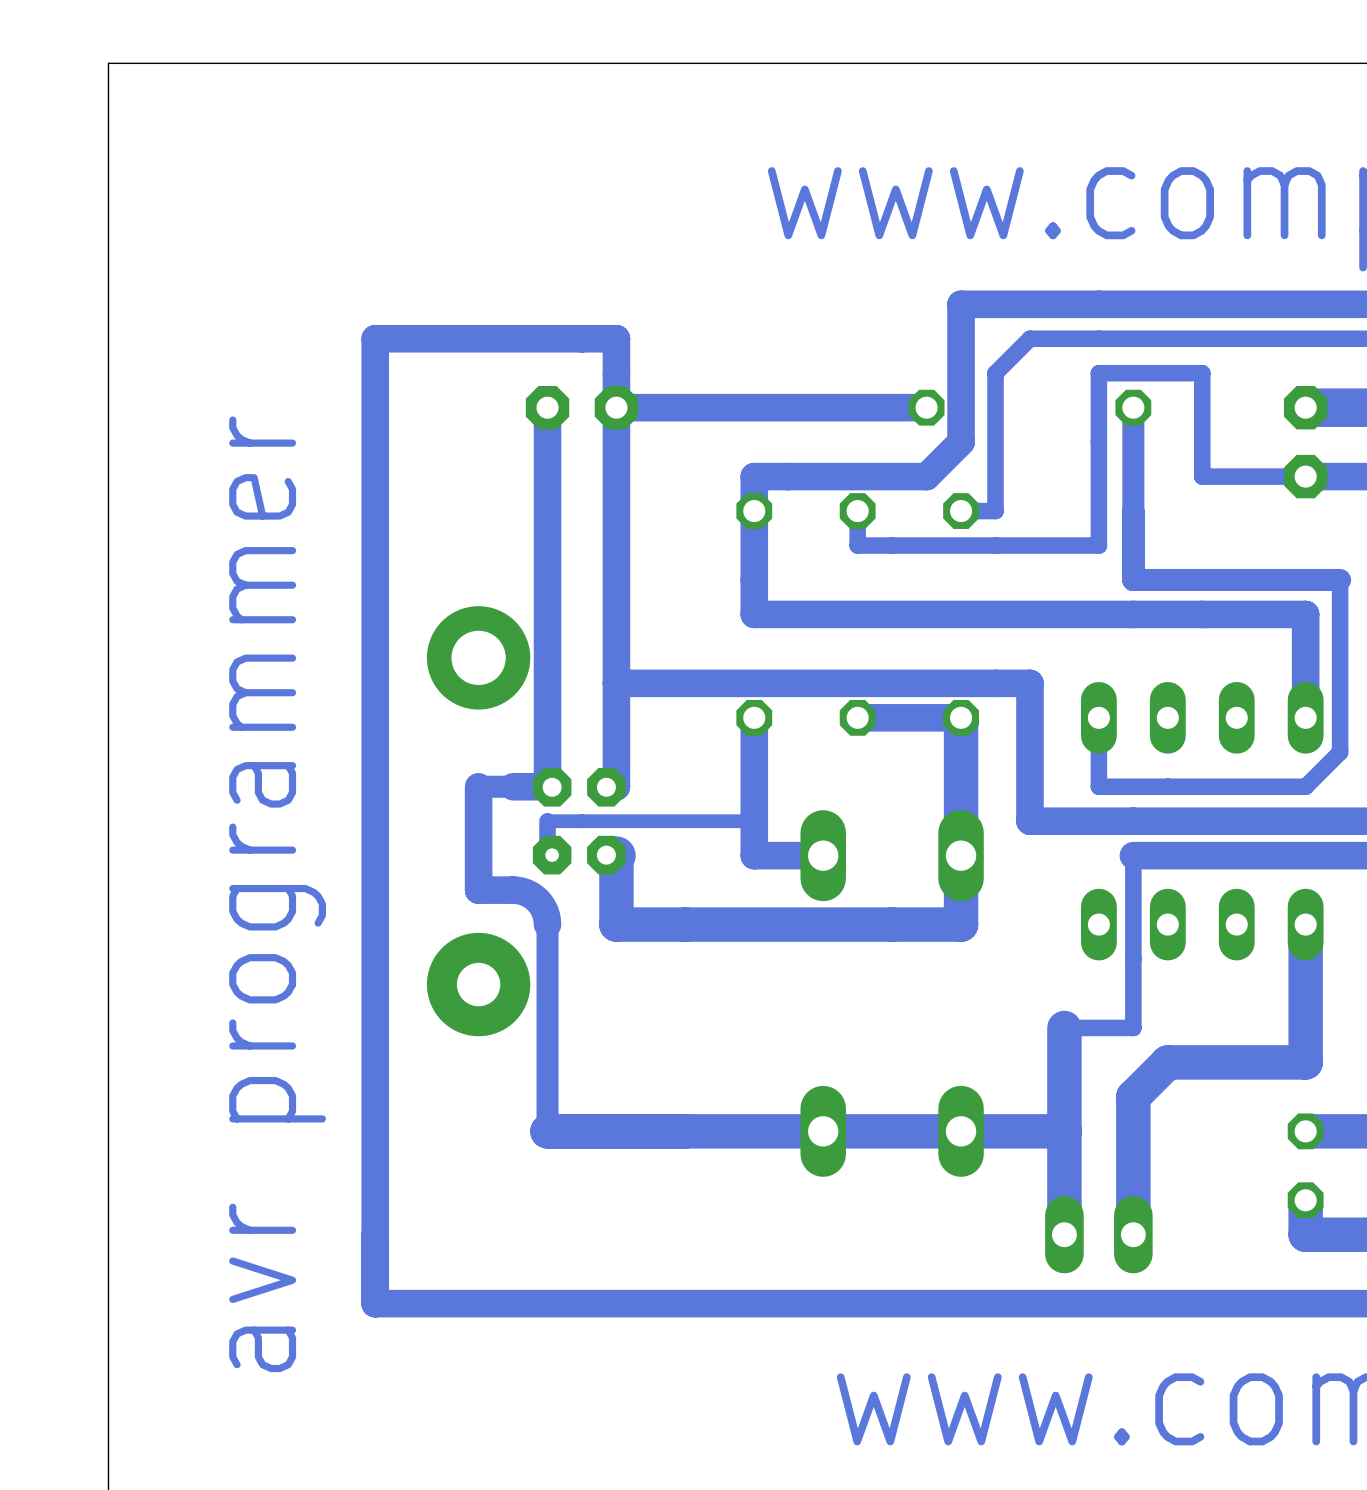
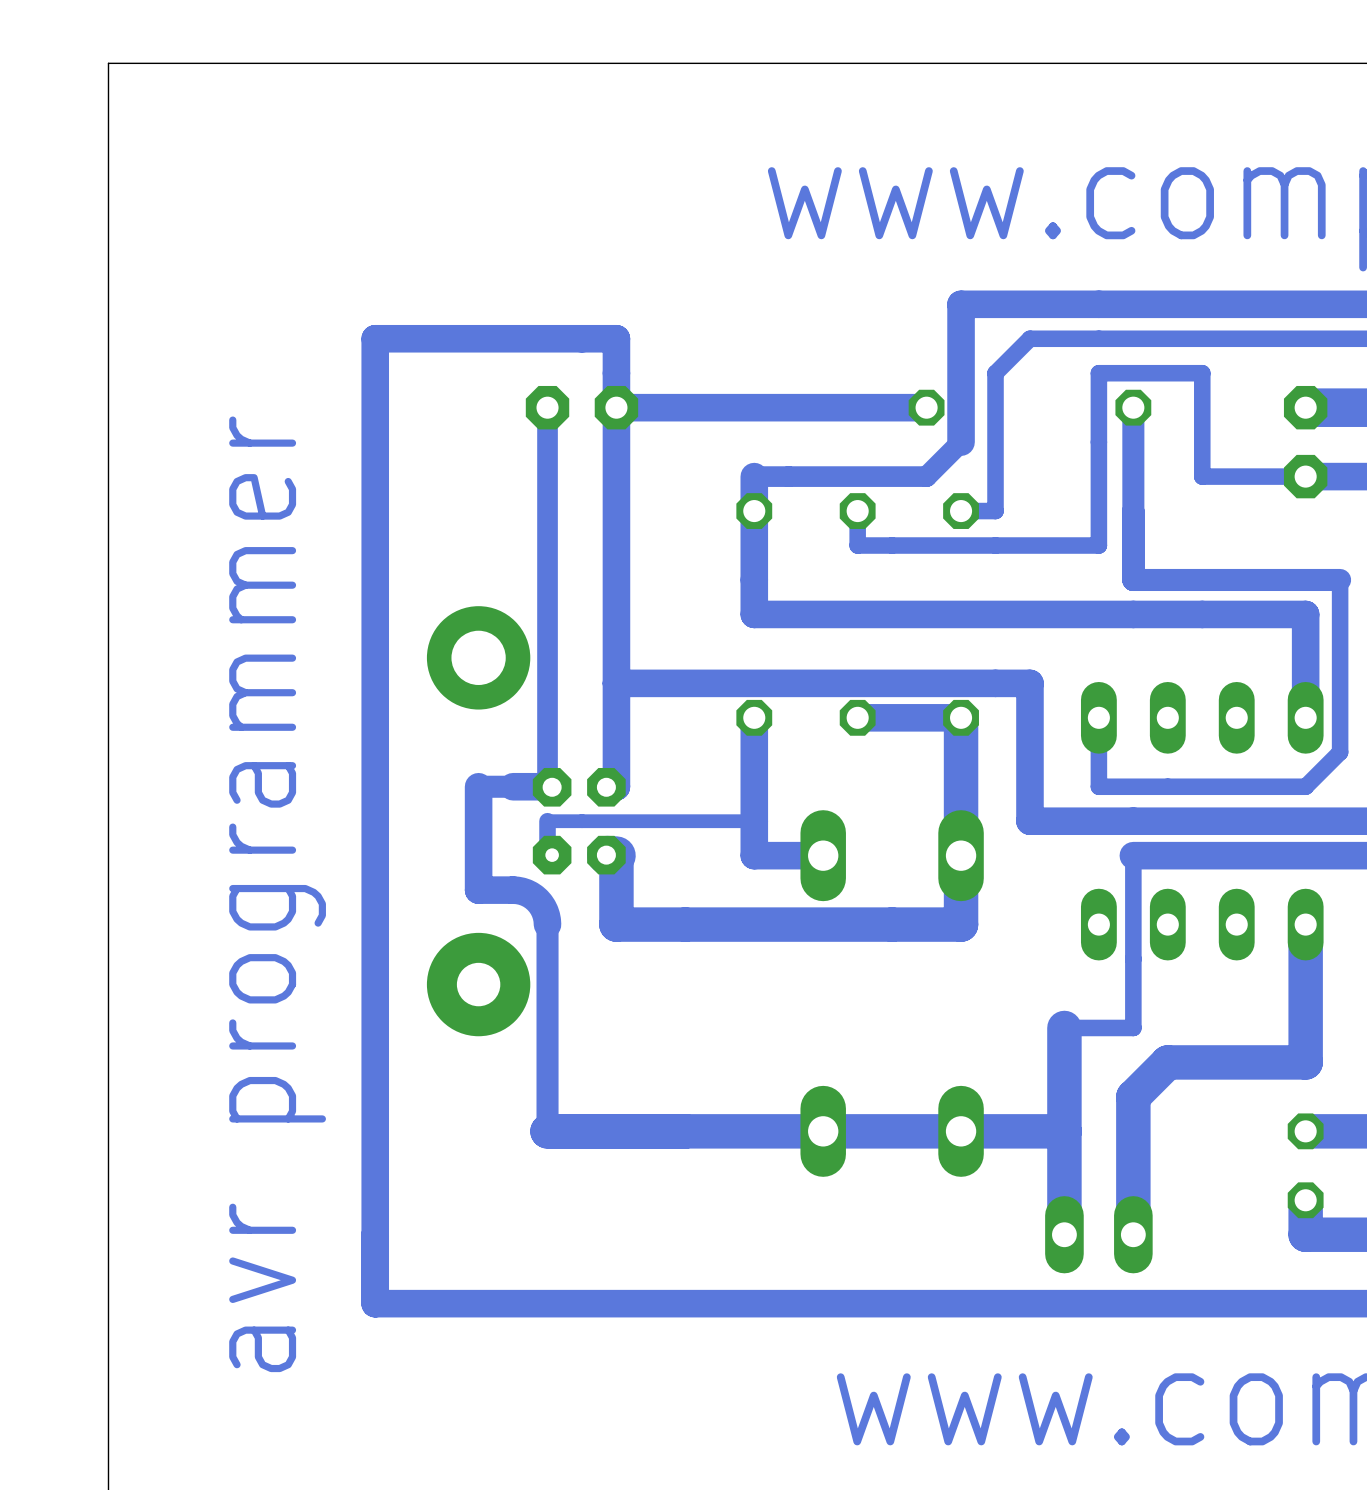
bottom track width: thick (547, 407) (547, 786) -> thin (547, 407) (547, 786)
bottom track width: thick (961, 442) (926, 476) (754, 476) -> thin (961, 442) (926, 476) (754, 476)

